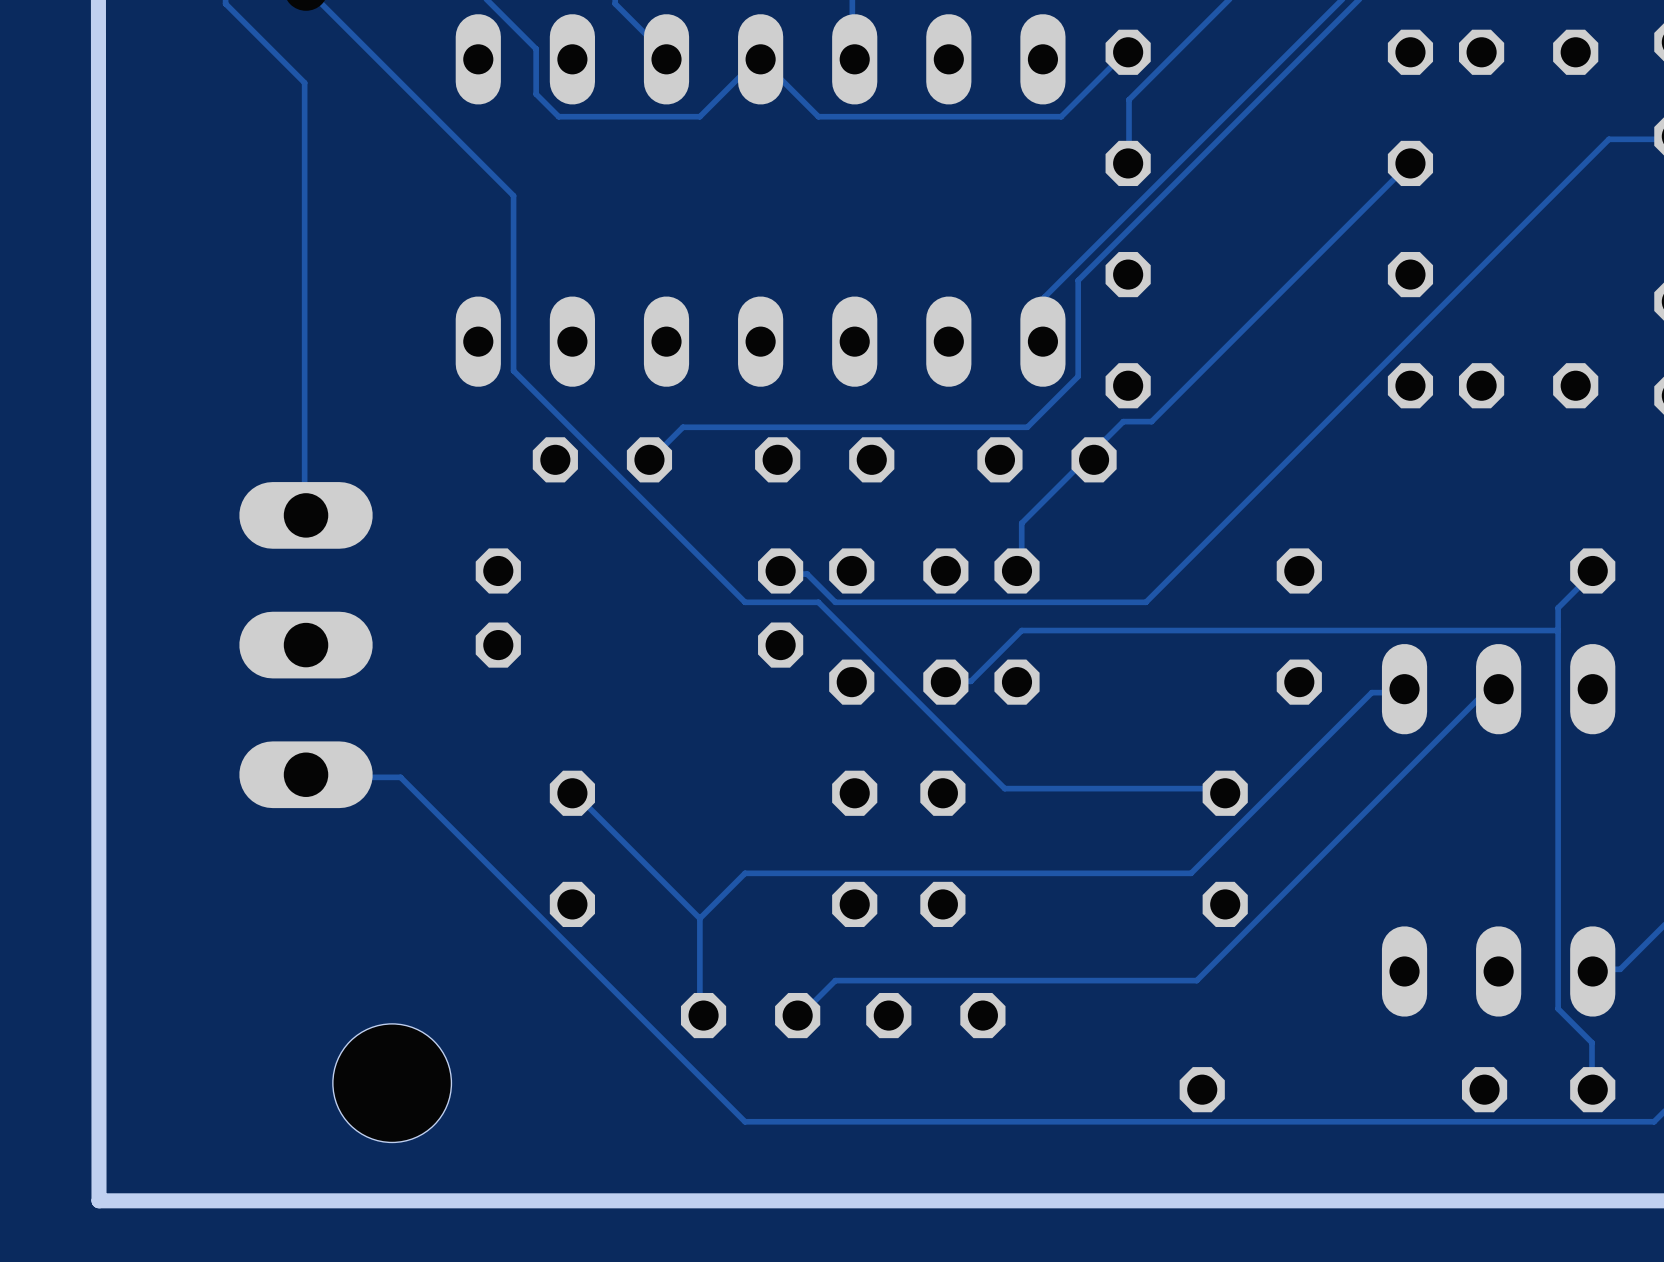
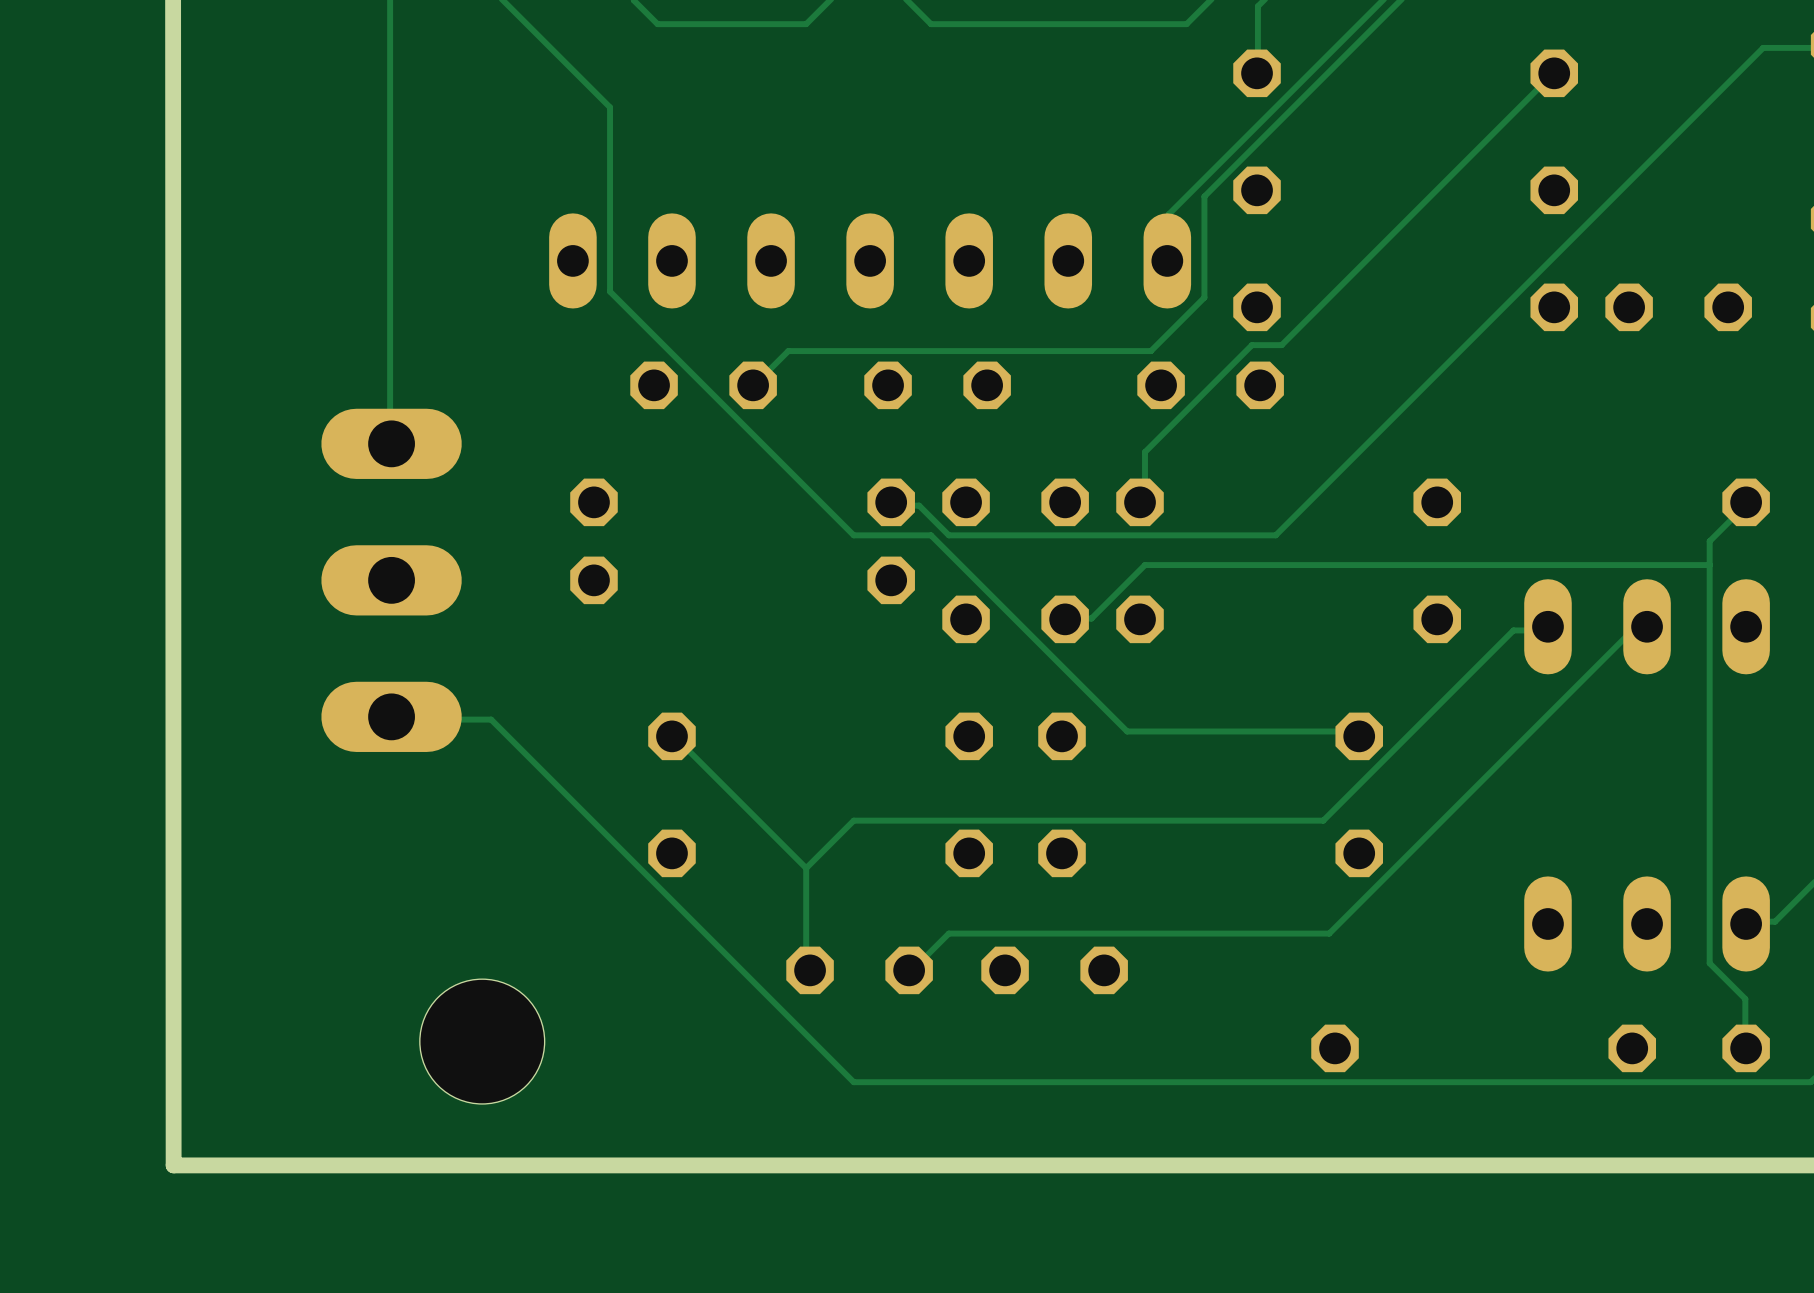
part position: (1047, 459) -> (1210, 385)

